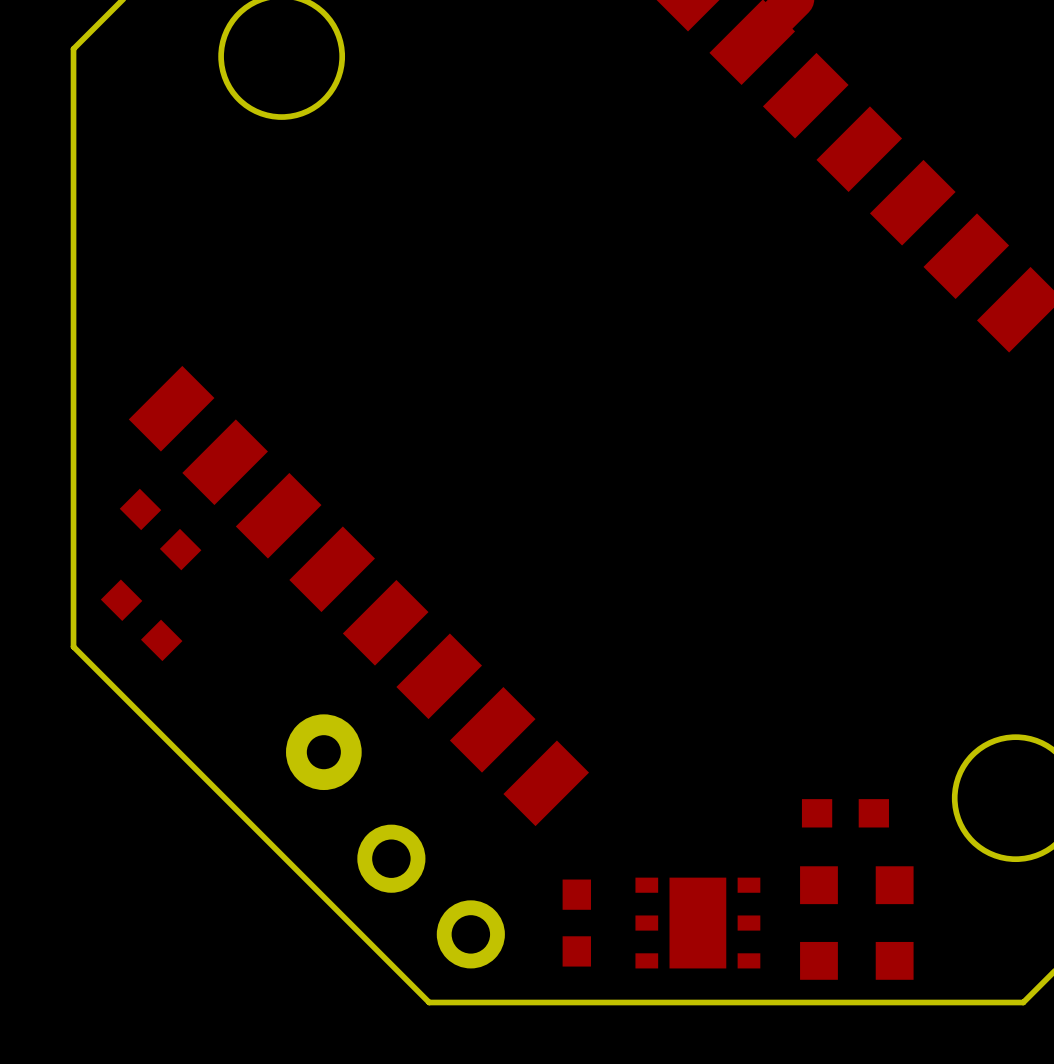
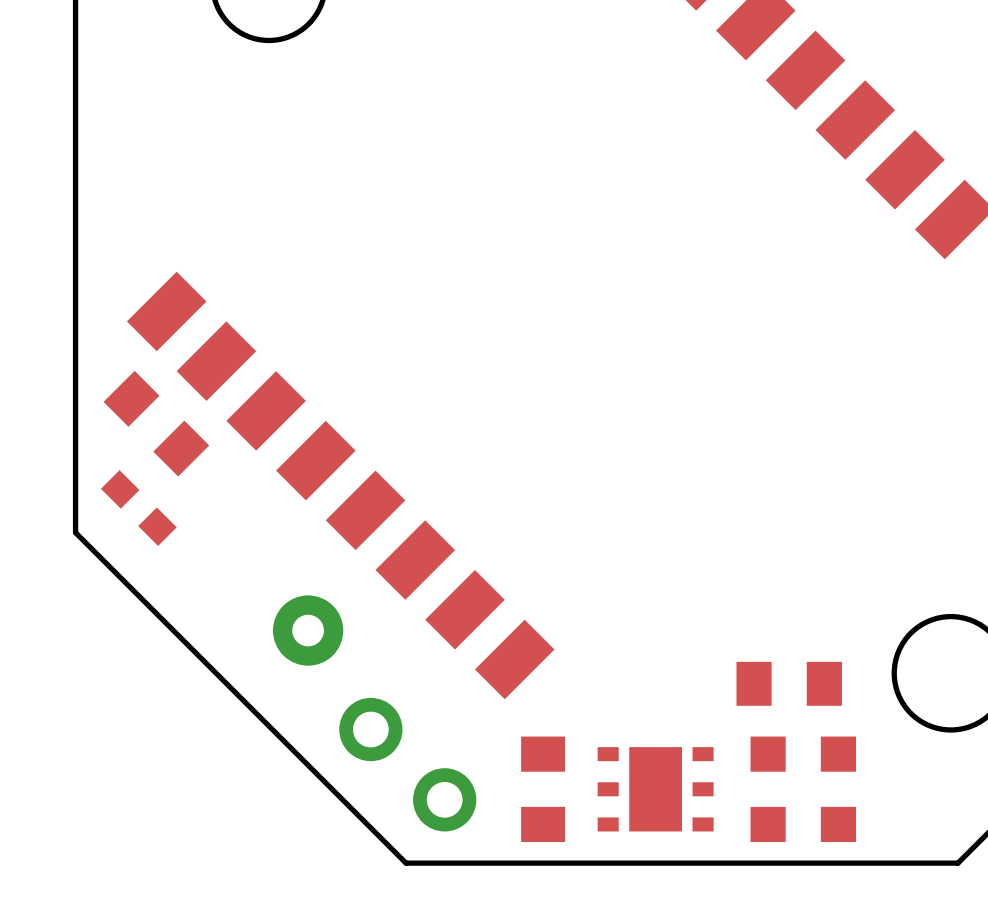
part footprint: [119, 488, 202, 571] -> [103, 370, 210, 477]
part footprint: [801, 799, 889, 828] -> [736, 661, 842, 706]
part footprint: [562, 879, 591, 967] -> [521, 736, 566, 843]

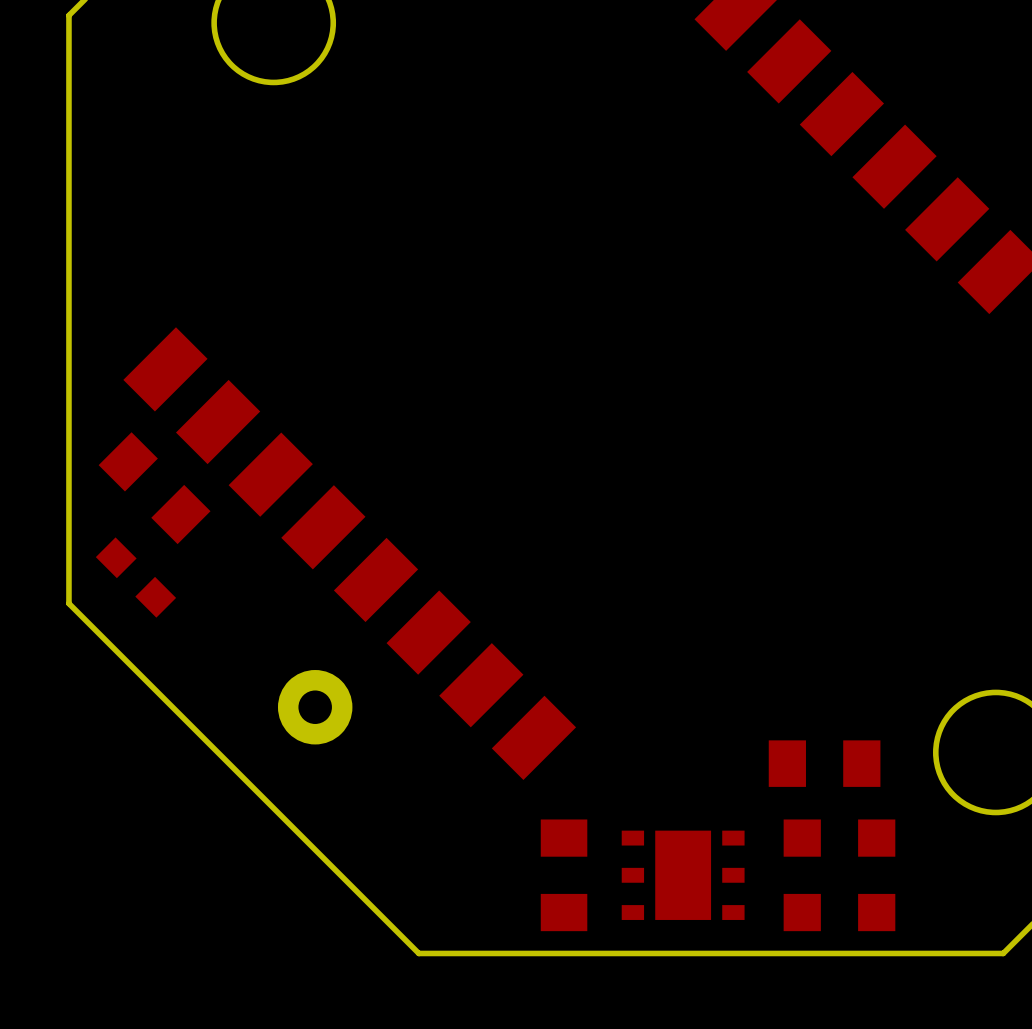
part: (370, 729) -> none
part: (444, 799) -> none

